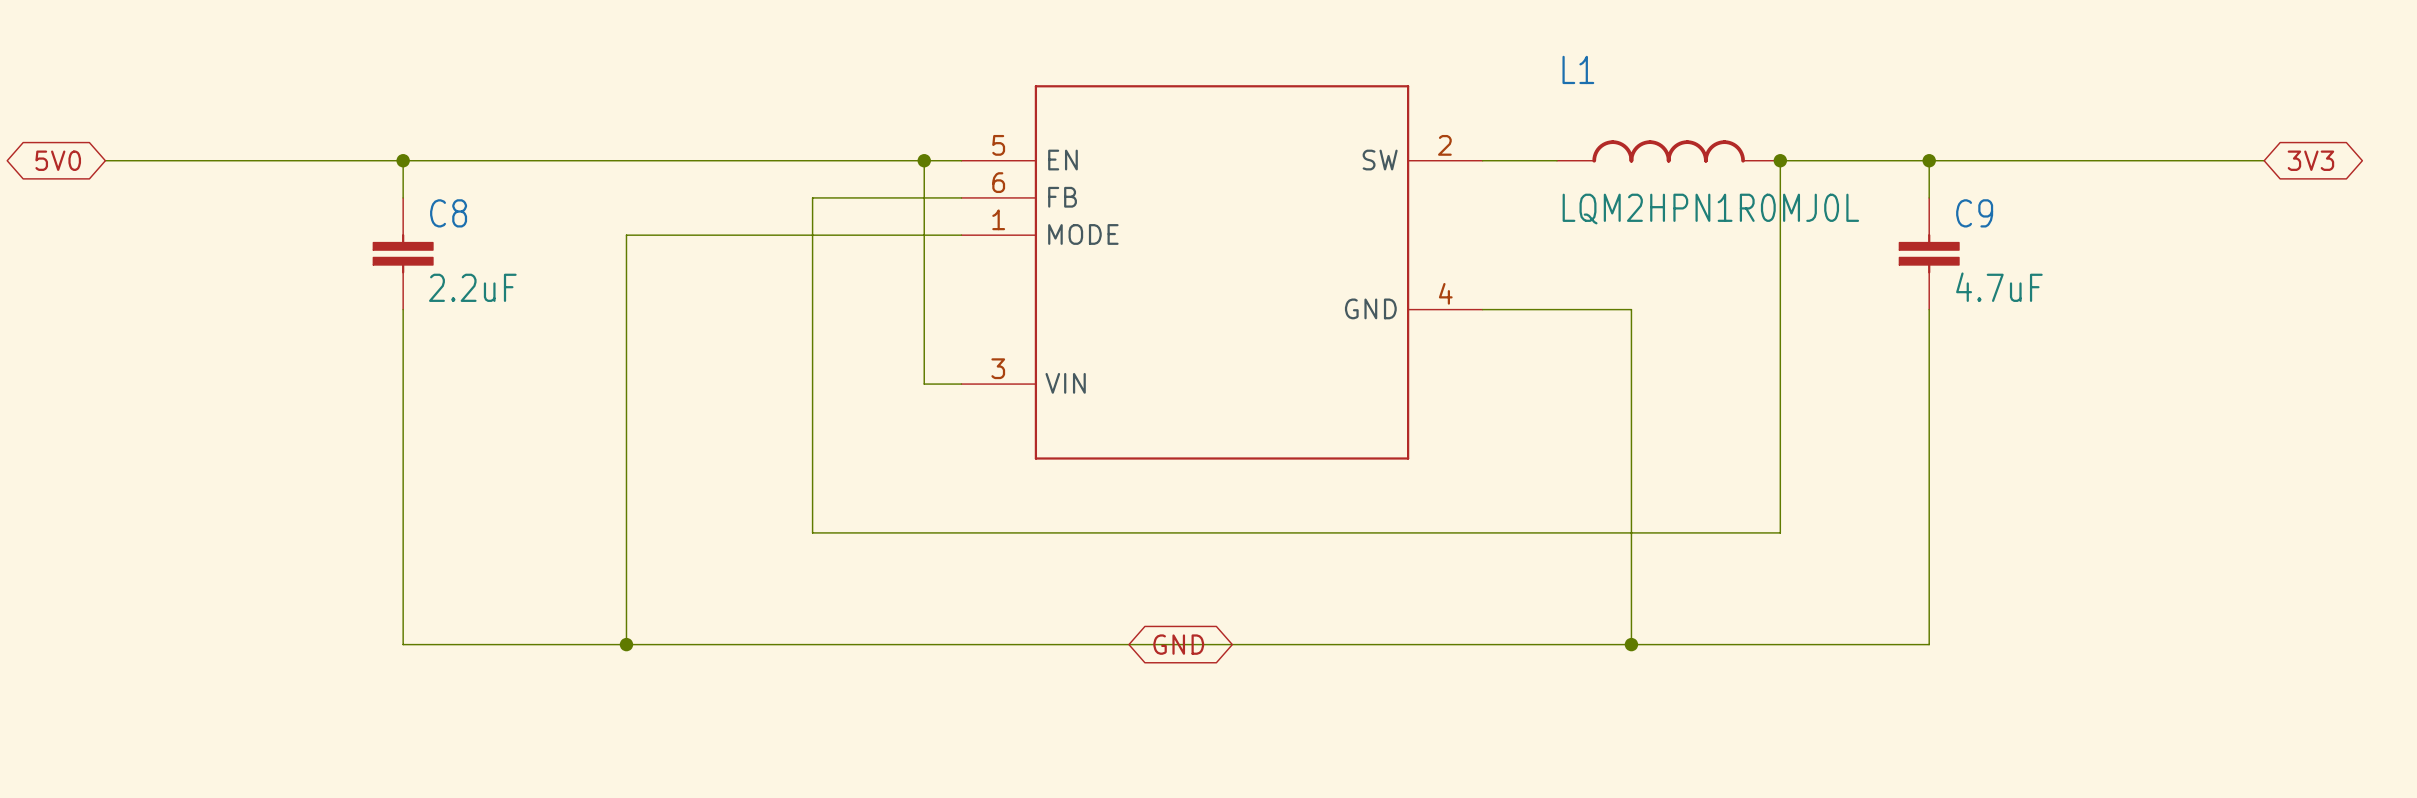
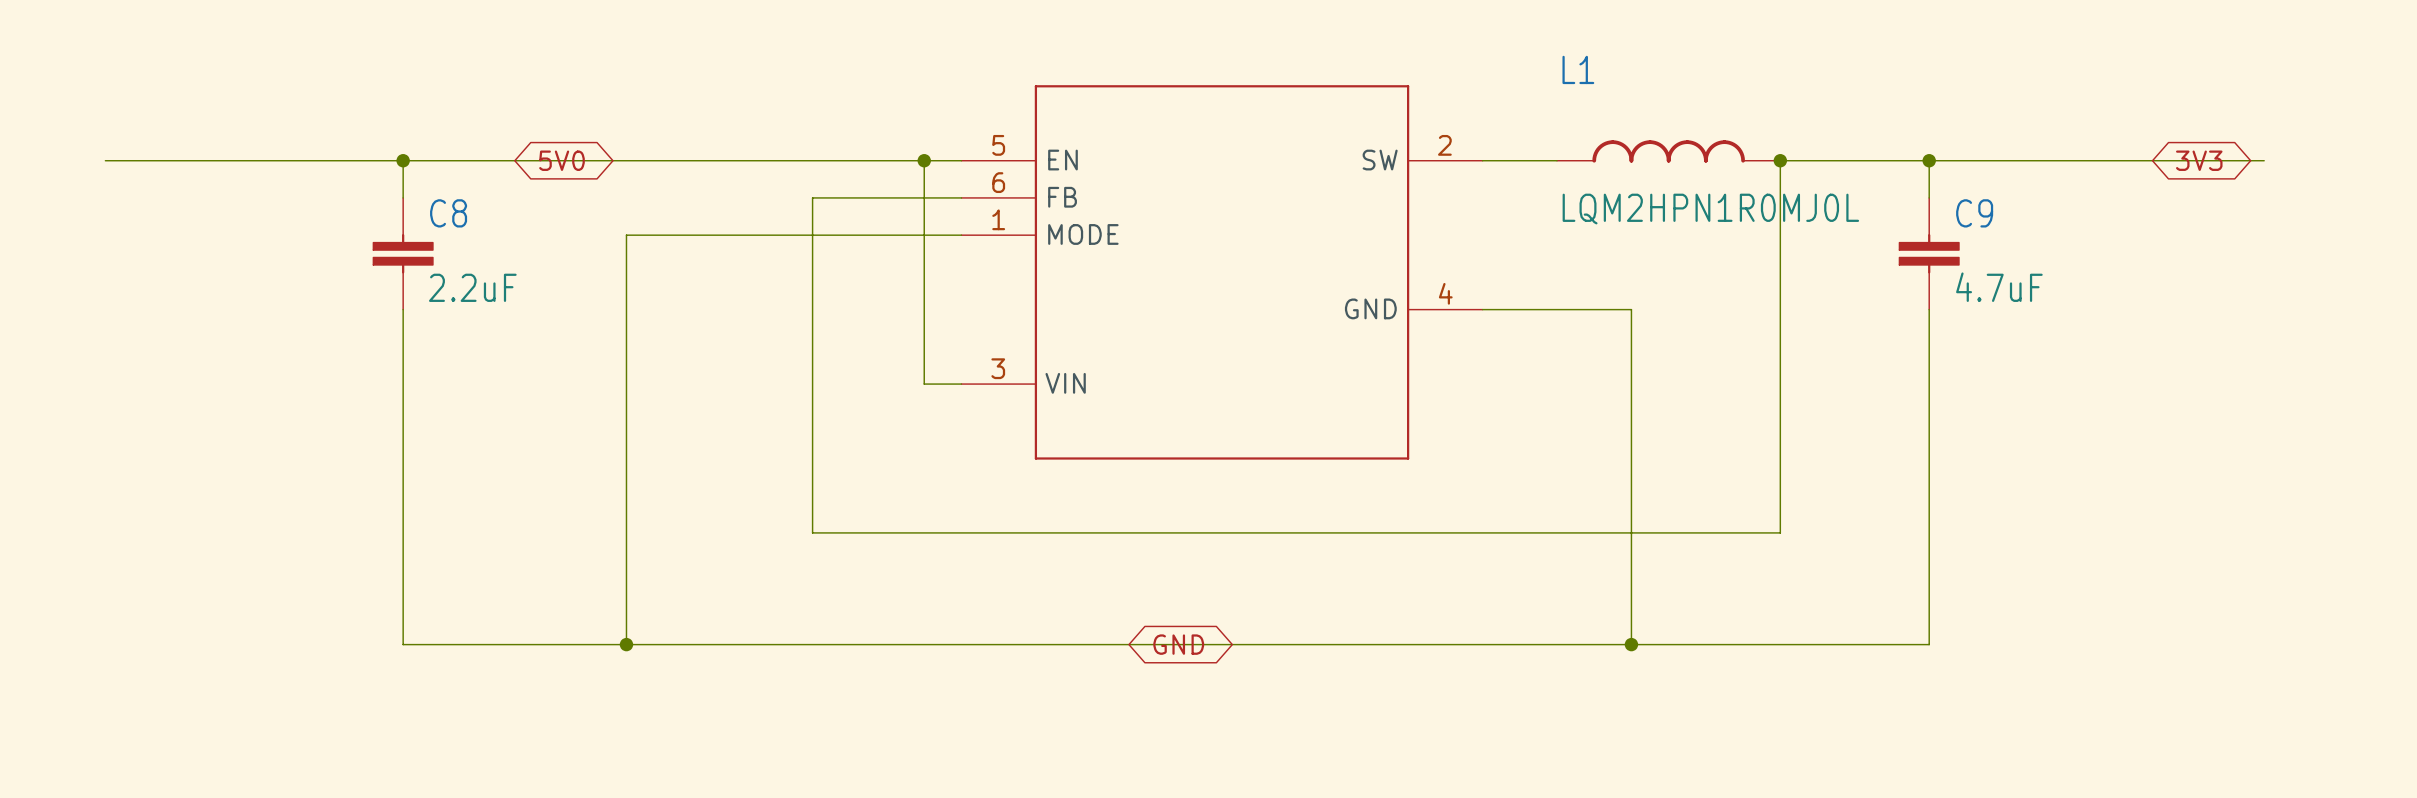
global label: 5V0 (58, 160) -> none
global label: none -> 5V0 (561, 160)
global label position: 3V3 (2310, 160) -> 3V3 (2199, 160)

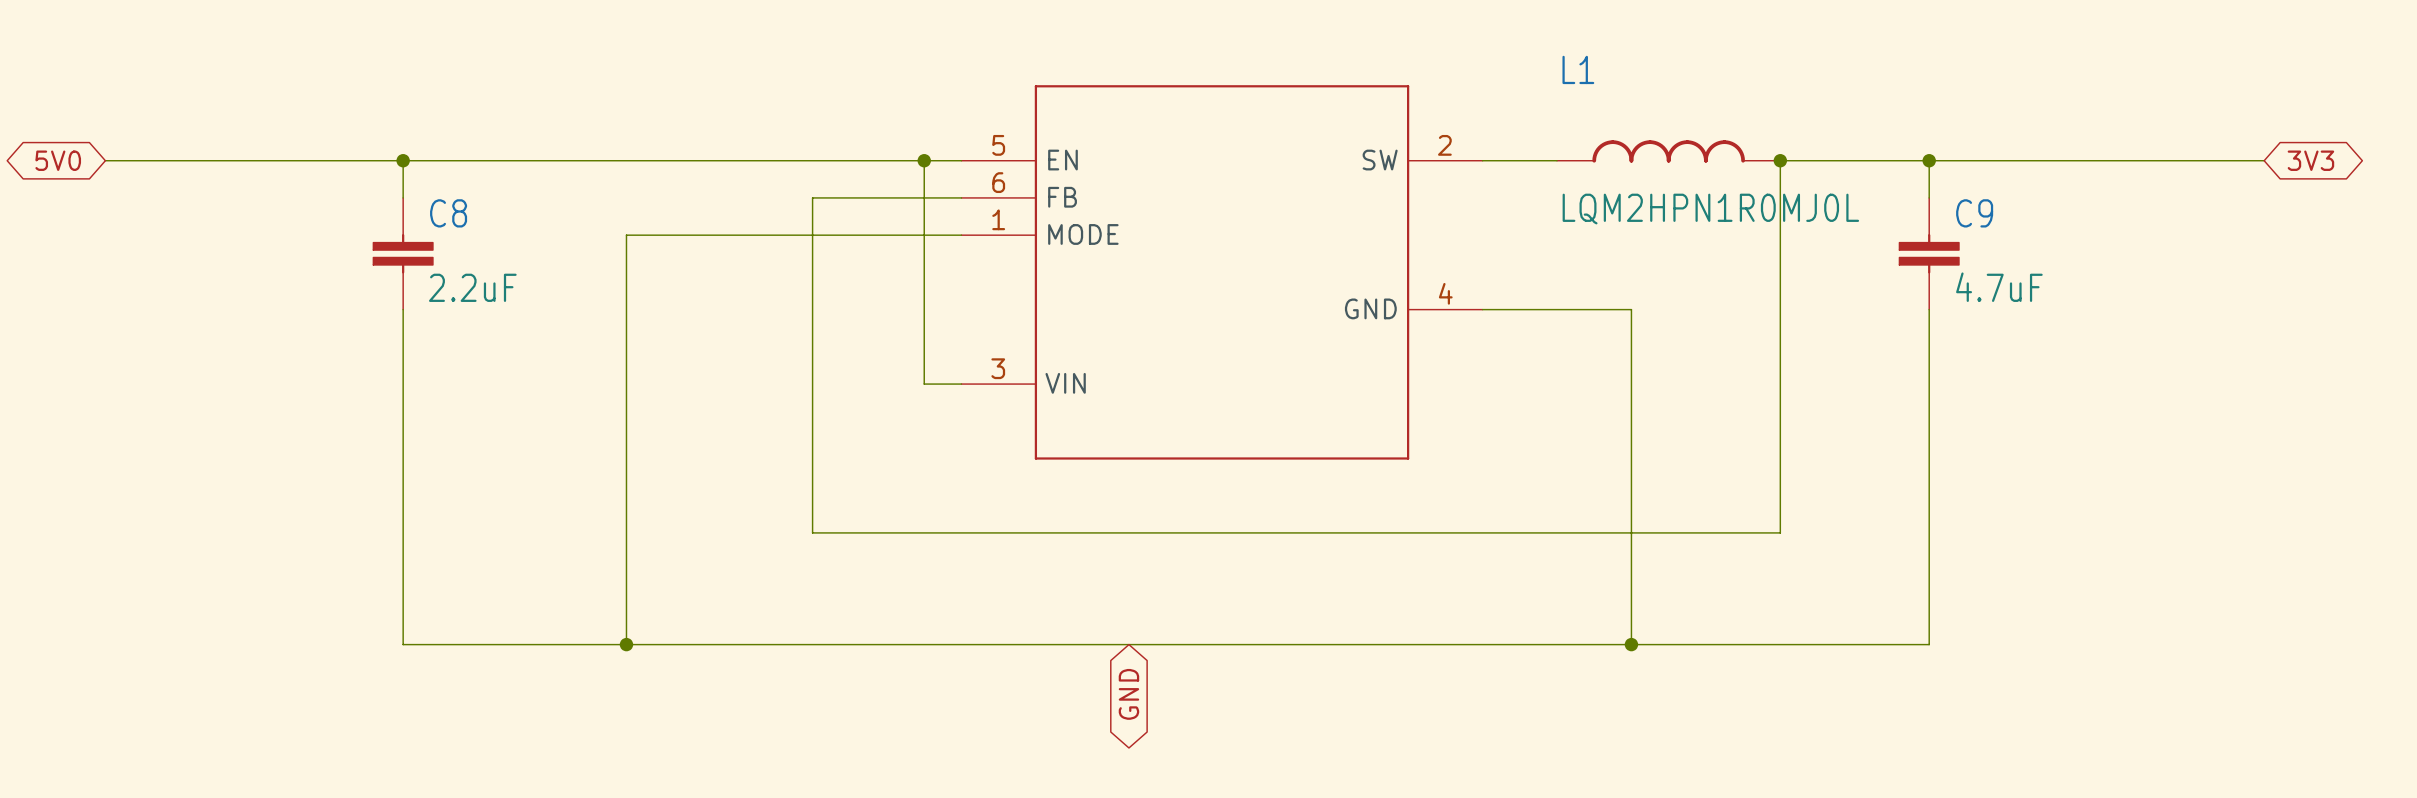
global label: none -> 5V0 (58, 160)
global label: 5V0 (561, 160) -> none
global label position: 3V3 (2199, 160) -> 3V3 (2310, 160)
global label rotation: 0° (1178, 644) -> 90° clockwise (1128, 694)

